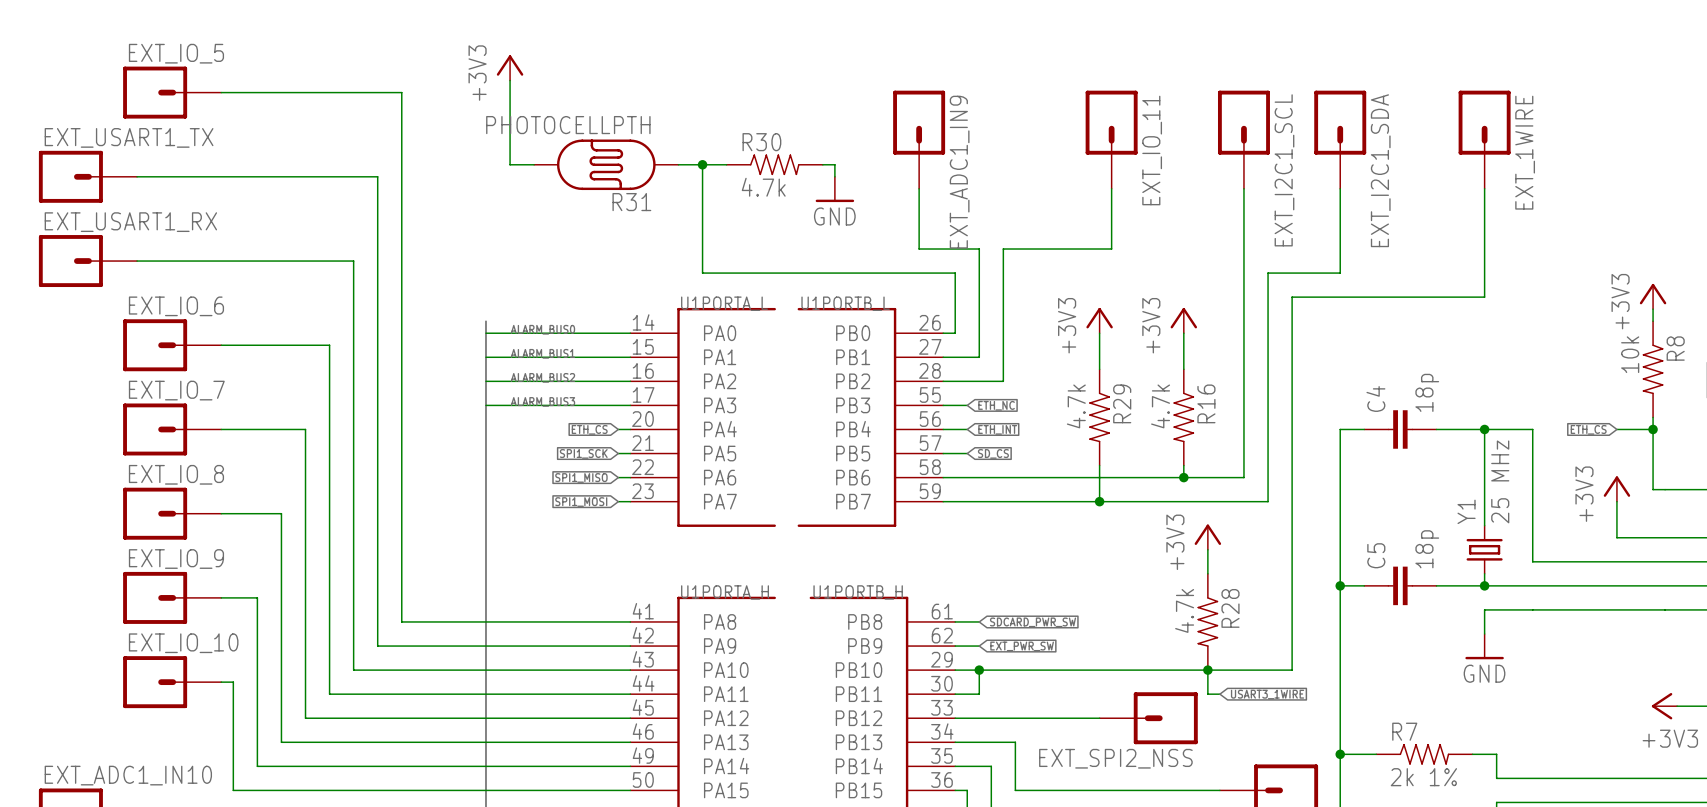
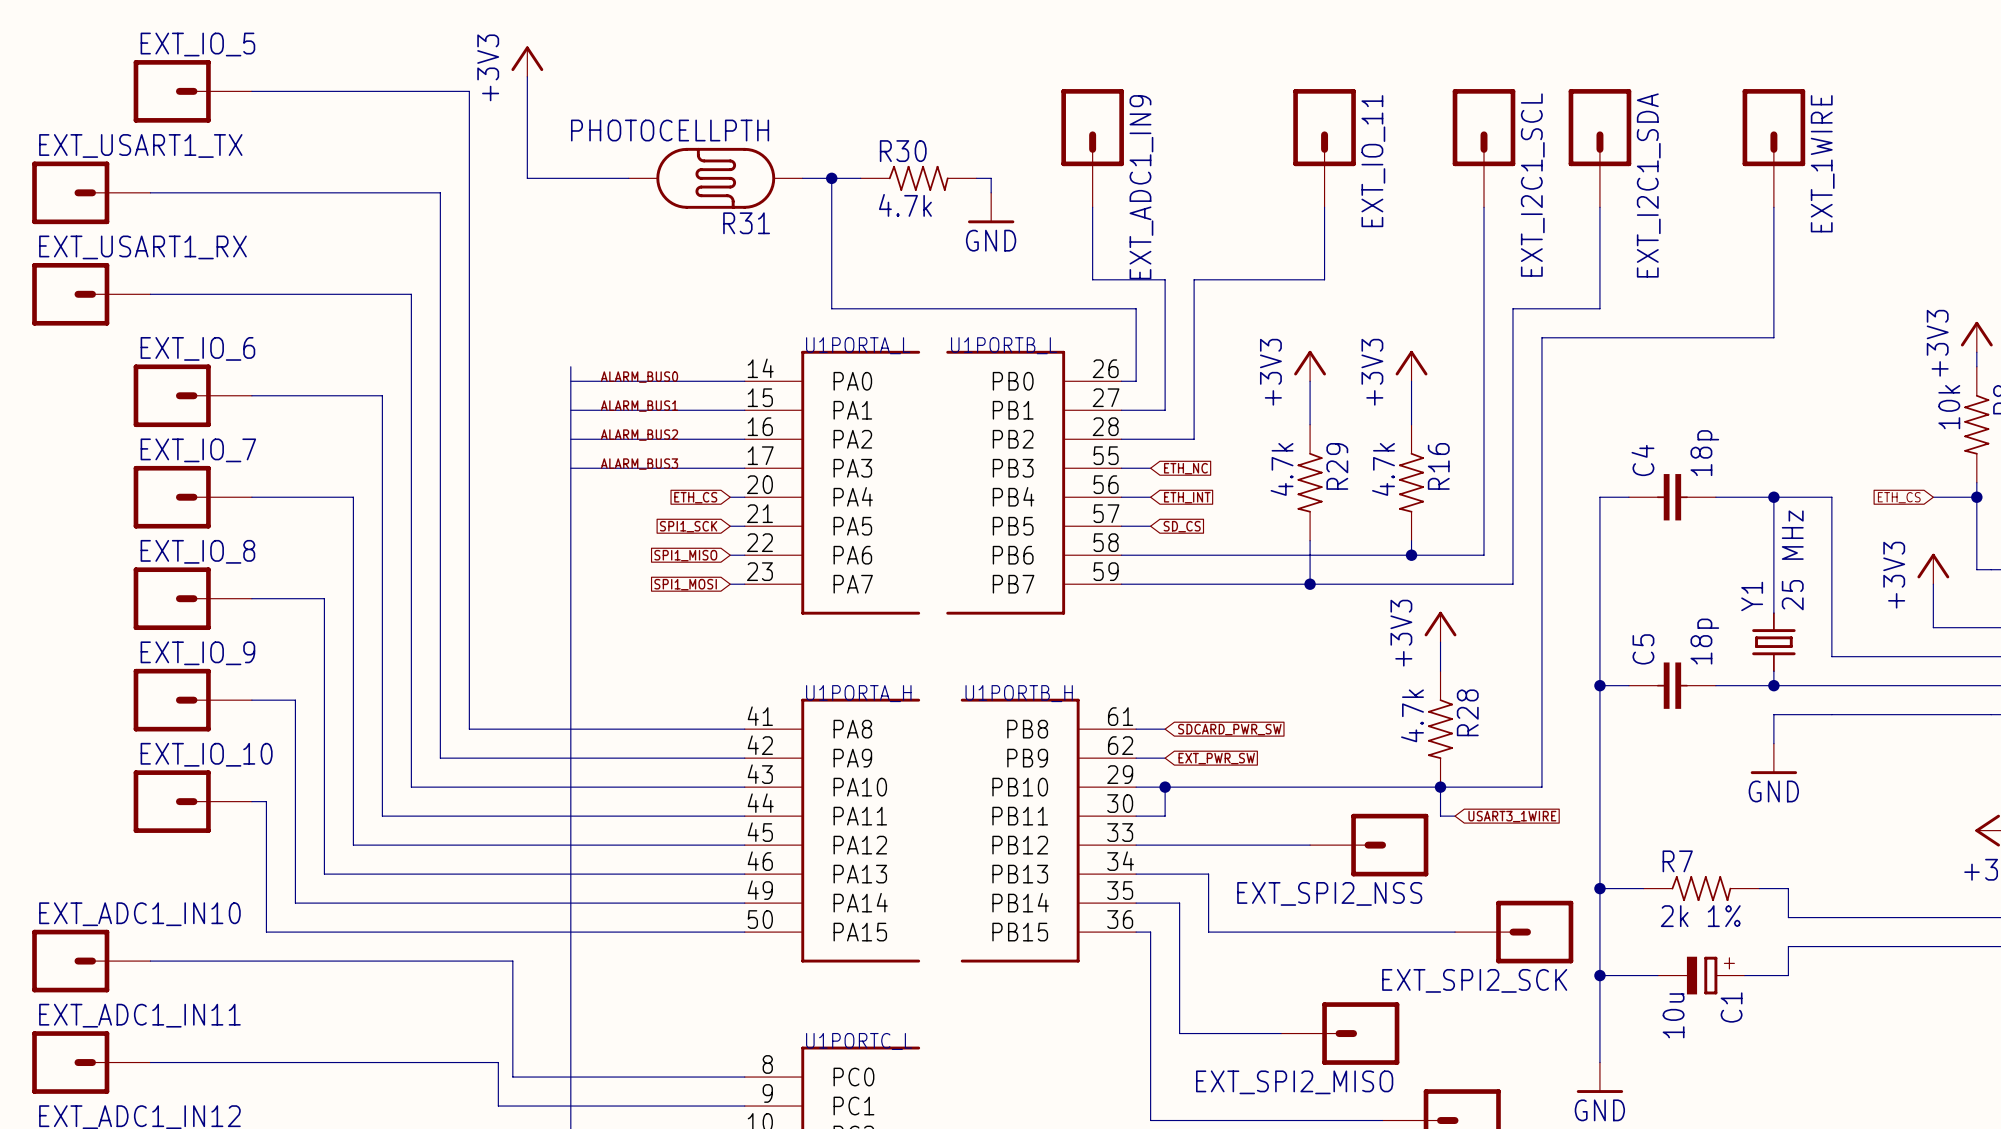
power symbol position: +3V3 (510, 67) -> +3V3 (527, 61)
wire: (510, 80) (510, 164) -> (527, 76) (527, 178) (599, 178)

